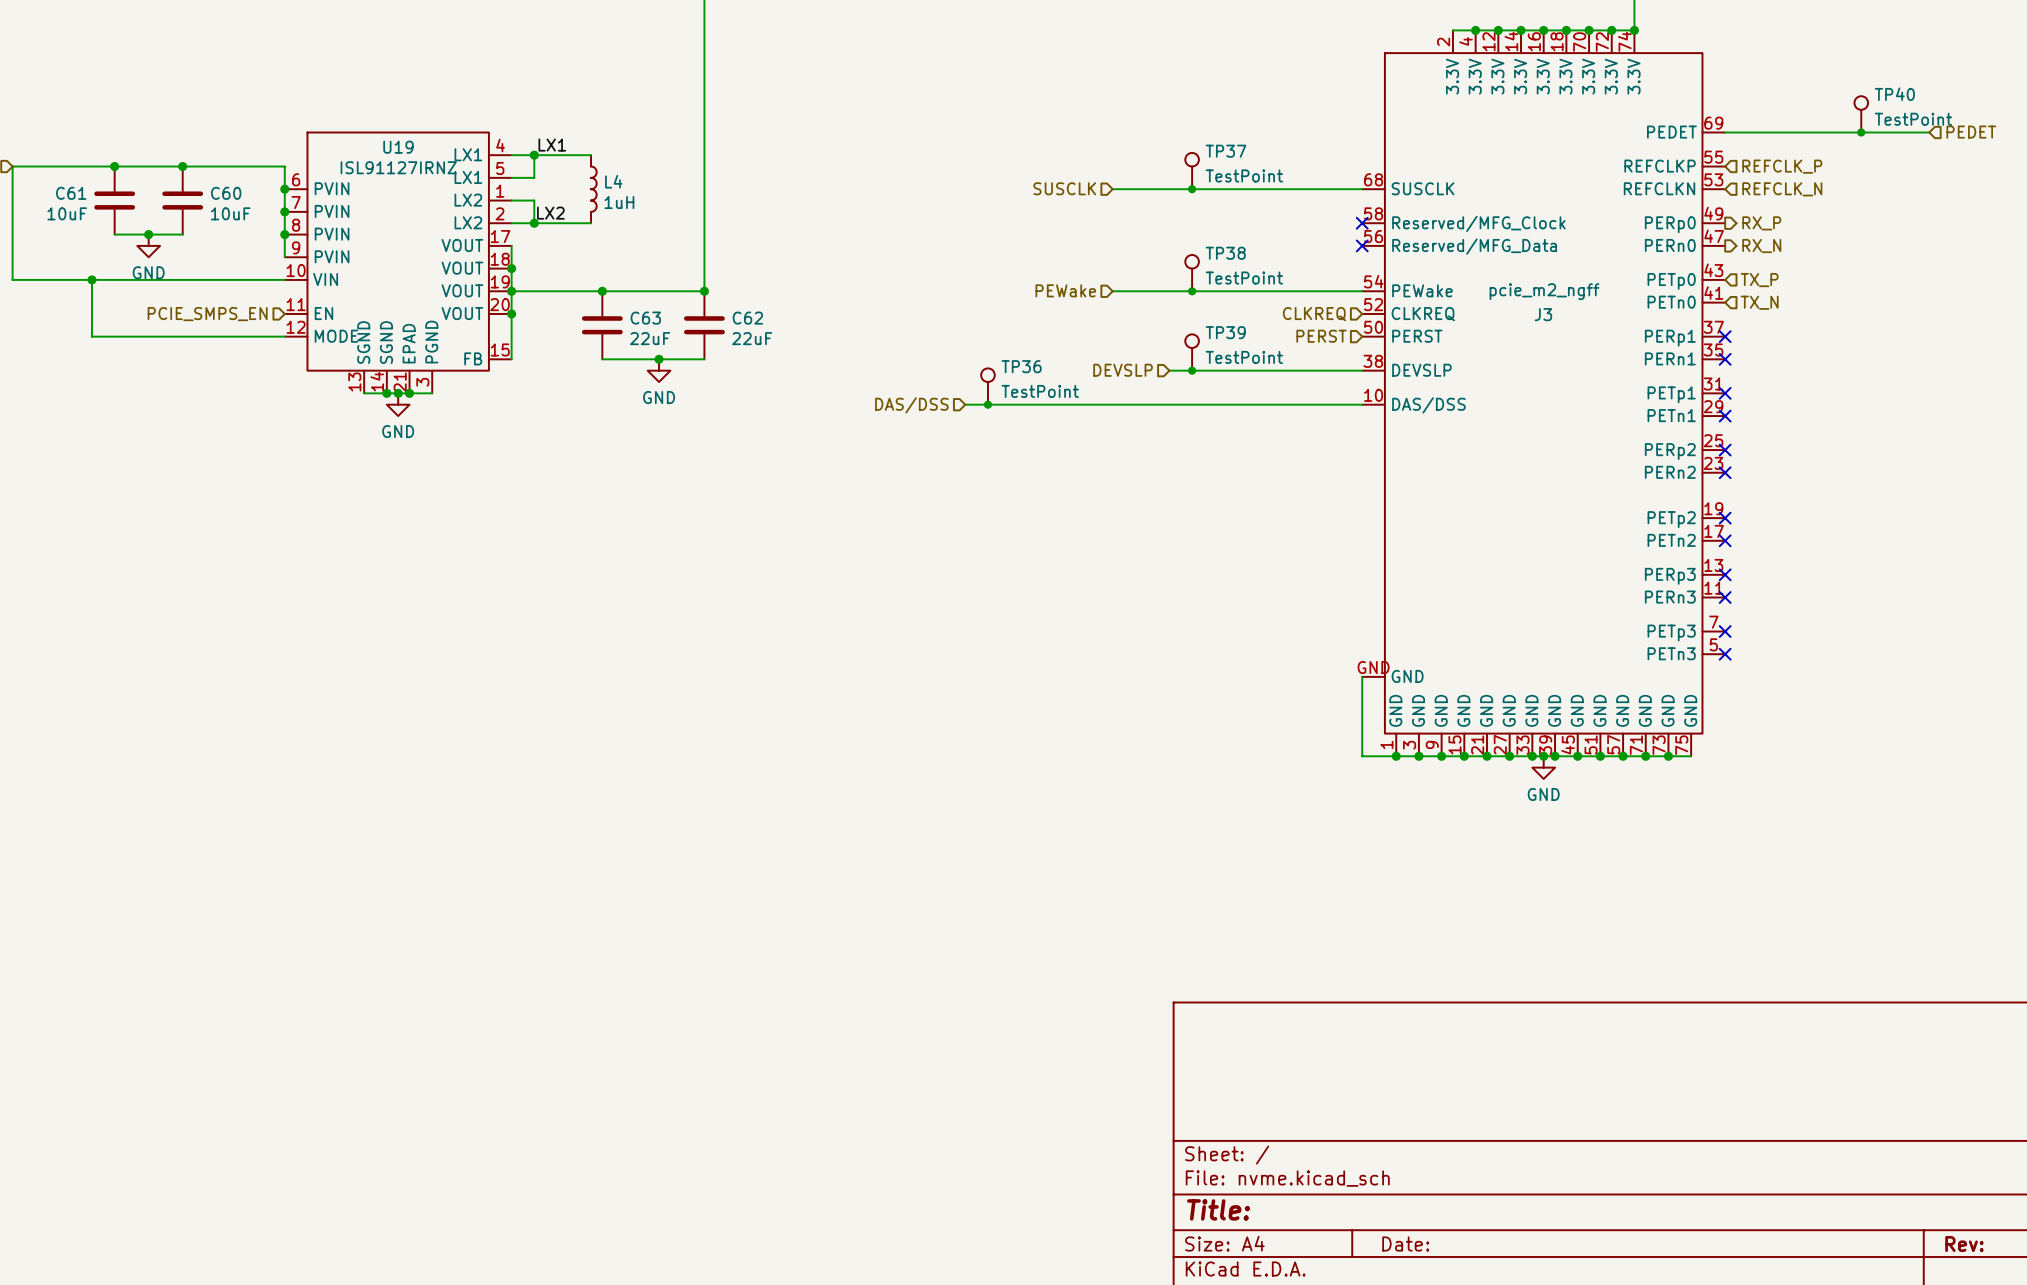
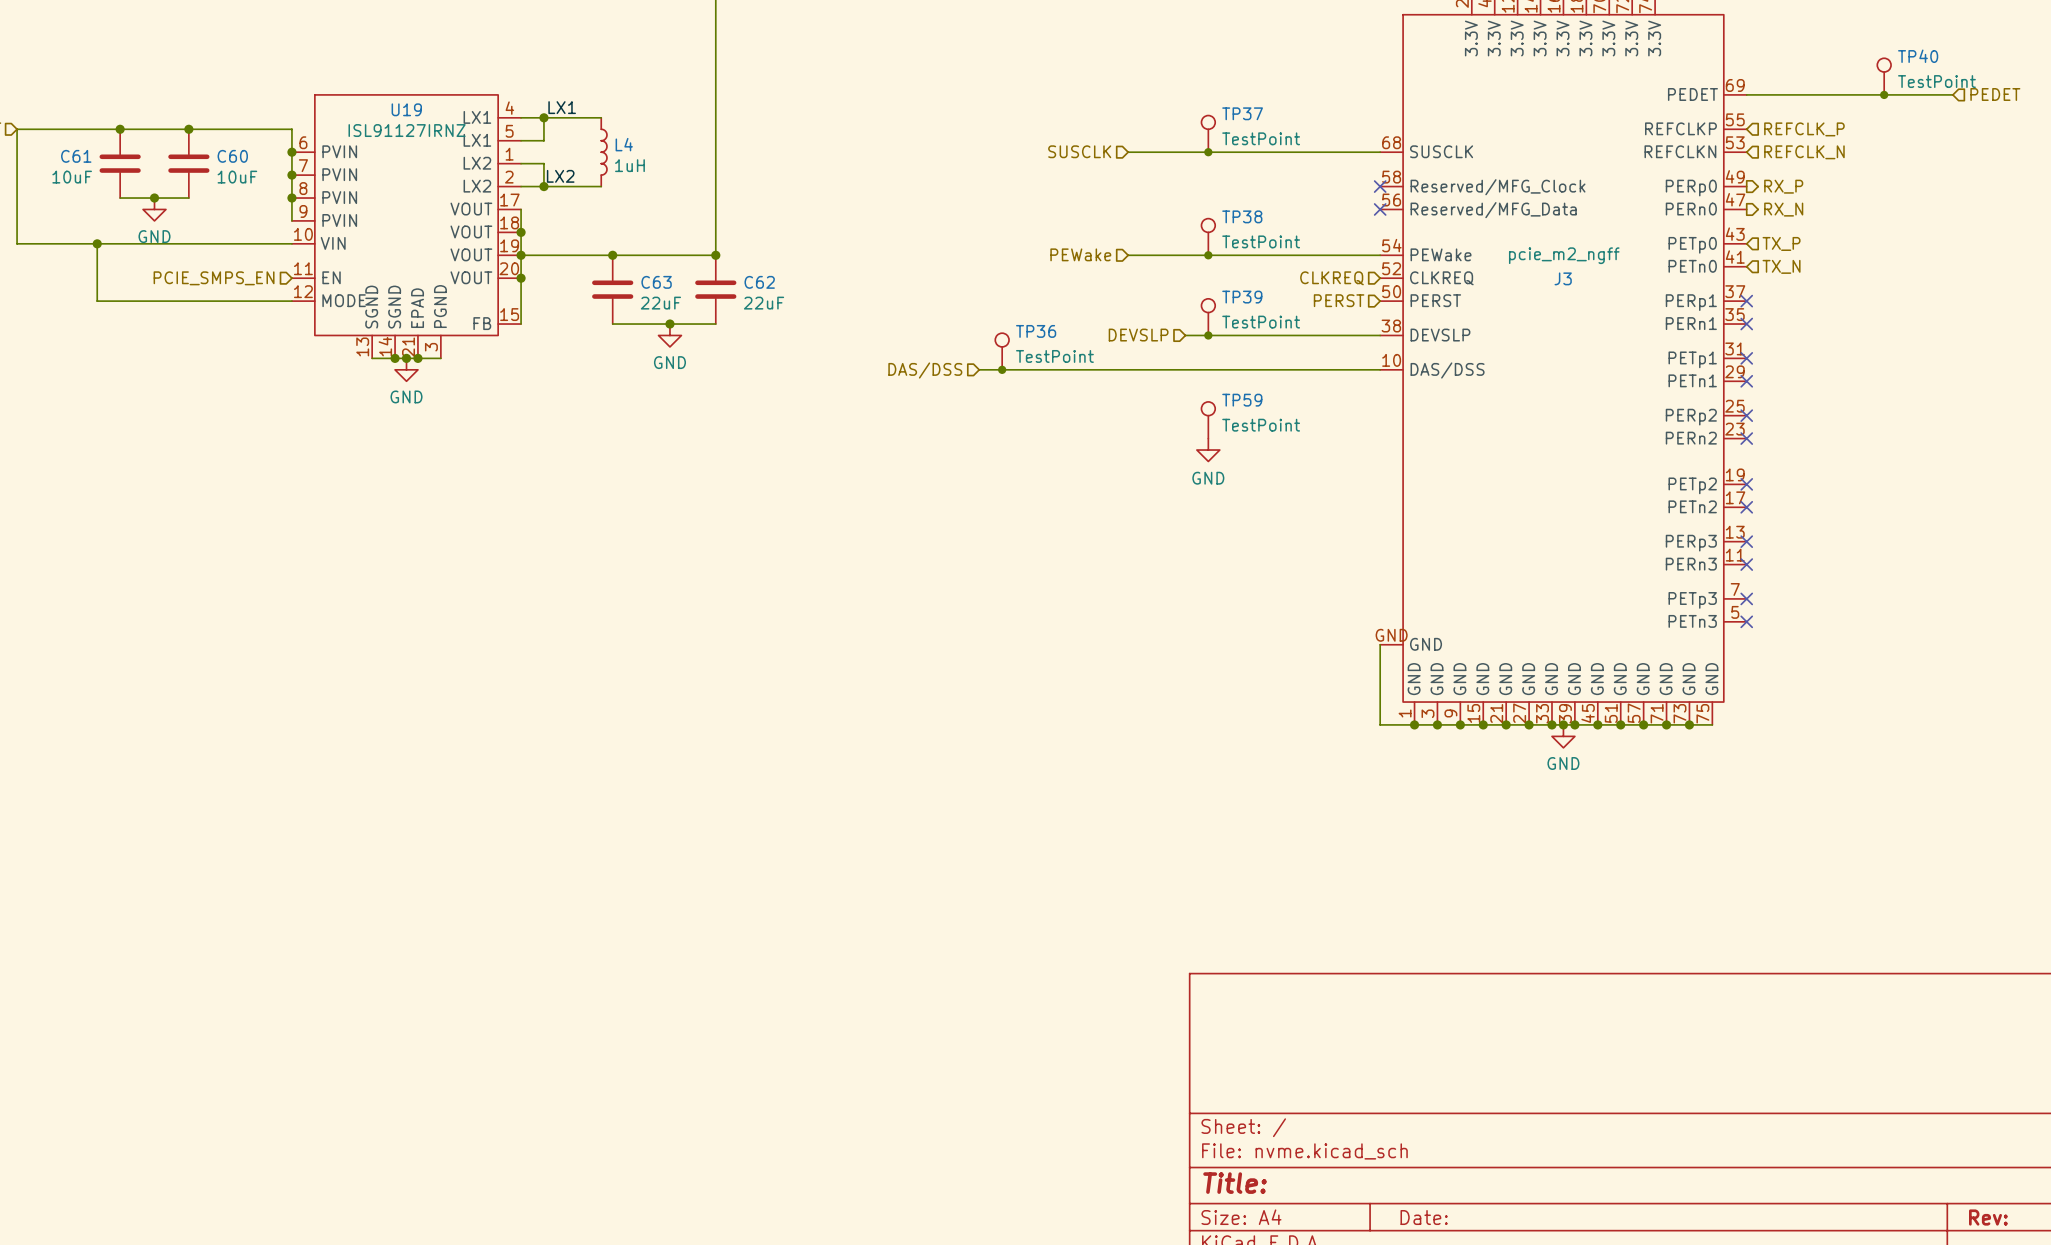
TP59: none -> TestPoint (1208, 420)
power symbol: none -> GND (1208, 450)

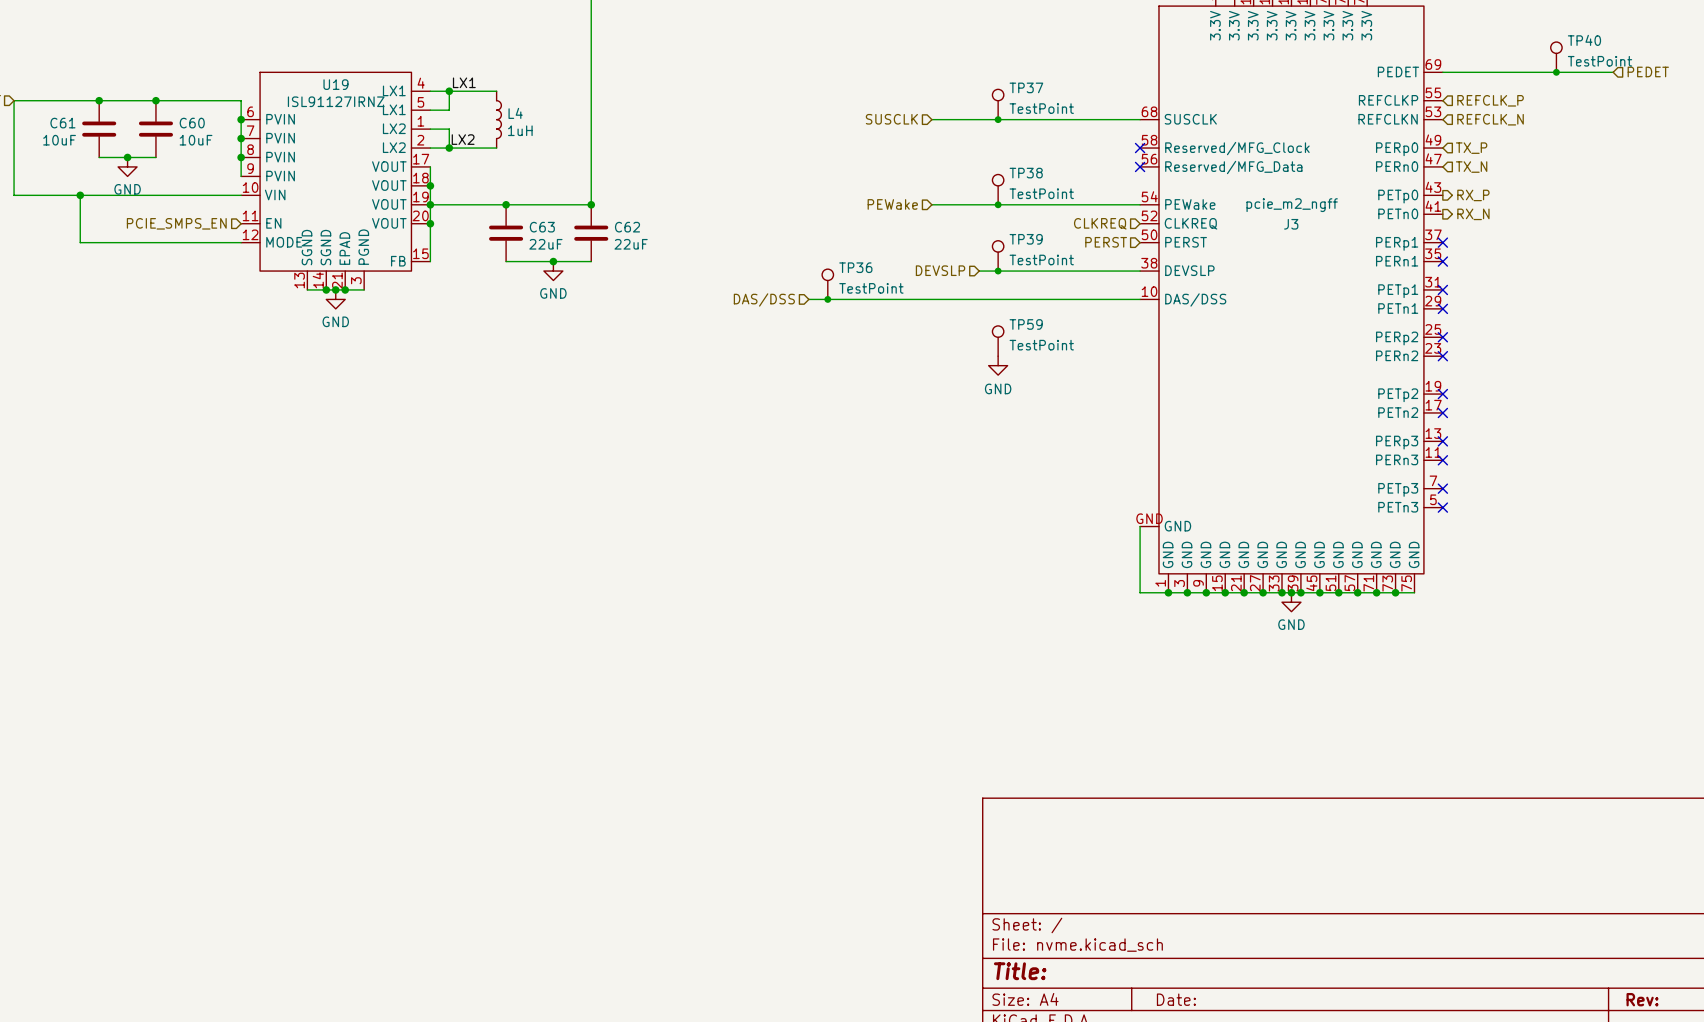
hierarchical label shape: output (1783, 186) -> input (1471, 148)
hierarchical label: RX_P (1783, 186) -> TX_P (1471, 148)
hierarchical label shape: output (1783, 209) -> input (1471, 167)
hierarchical label: RX_N (1783, 209) -> TX_N (1471, 167)
hierarchical label shape: input (1781, 243) -> output (1473, 195)
hierarchical label: TX_P (1781, 243) -> RX_P (1473, 195)
hierarchical label shape: input (1781, 266) -> output (1473, 214)
hierarchical label: TX_N (1781, 266) -> RX_N (1473, 214)

